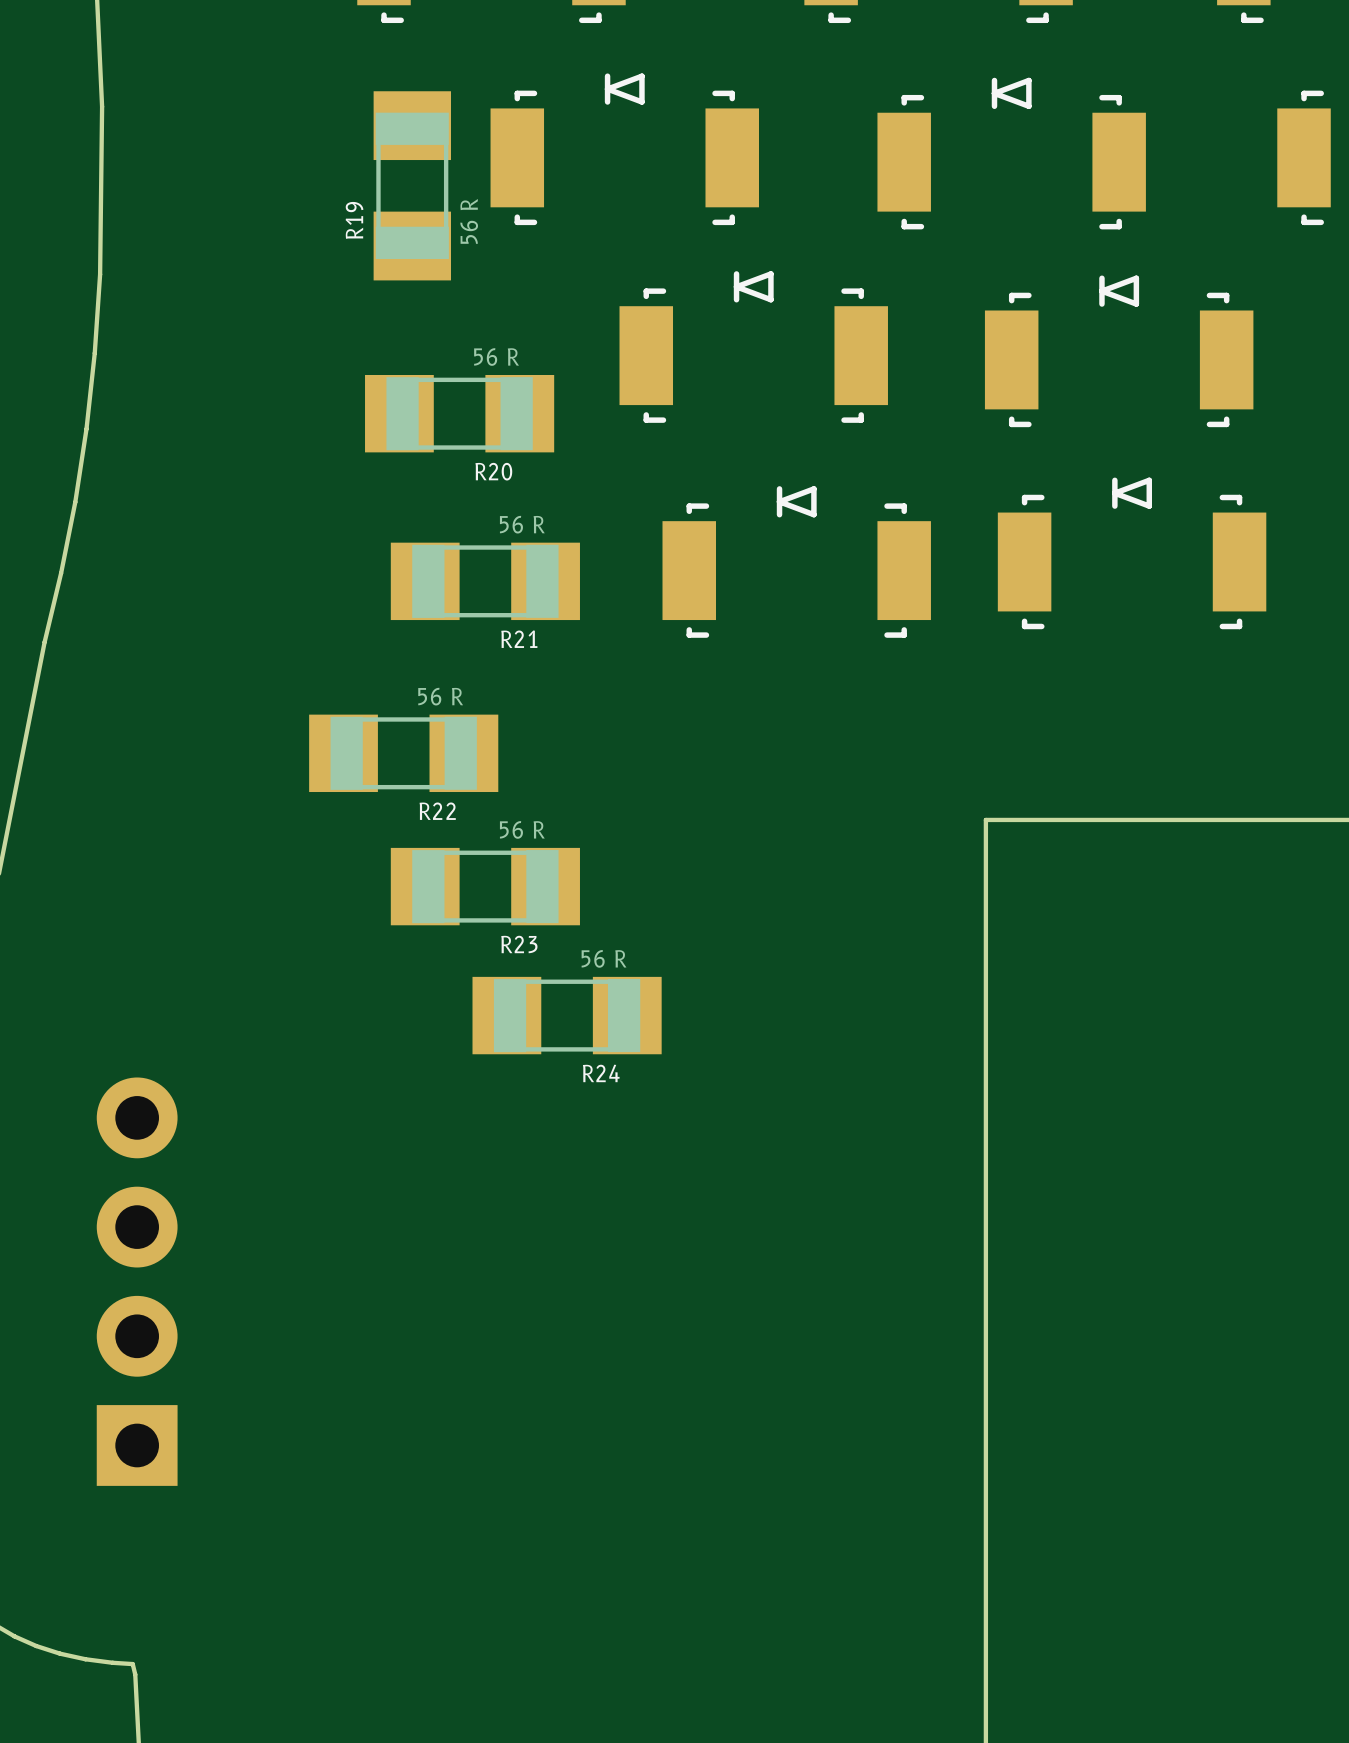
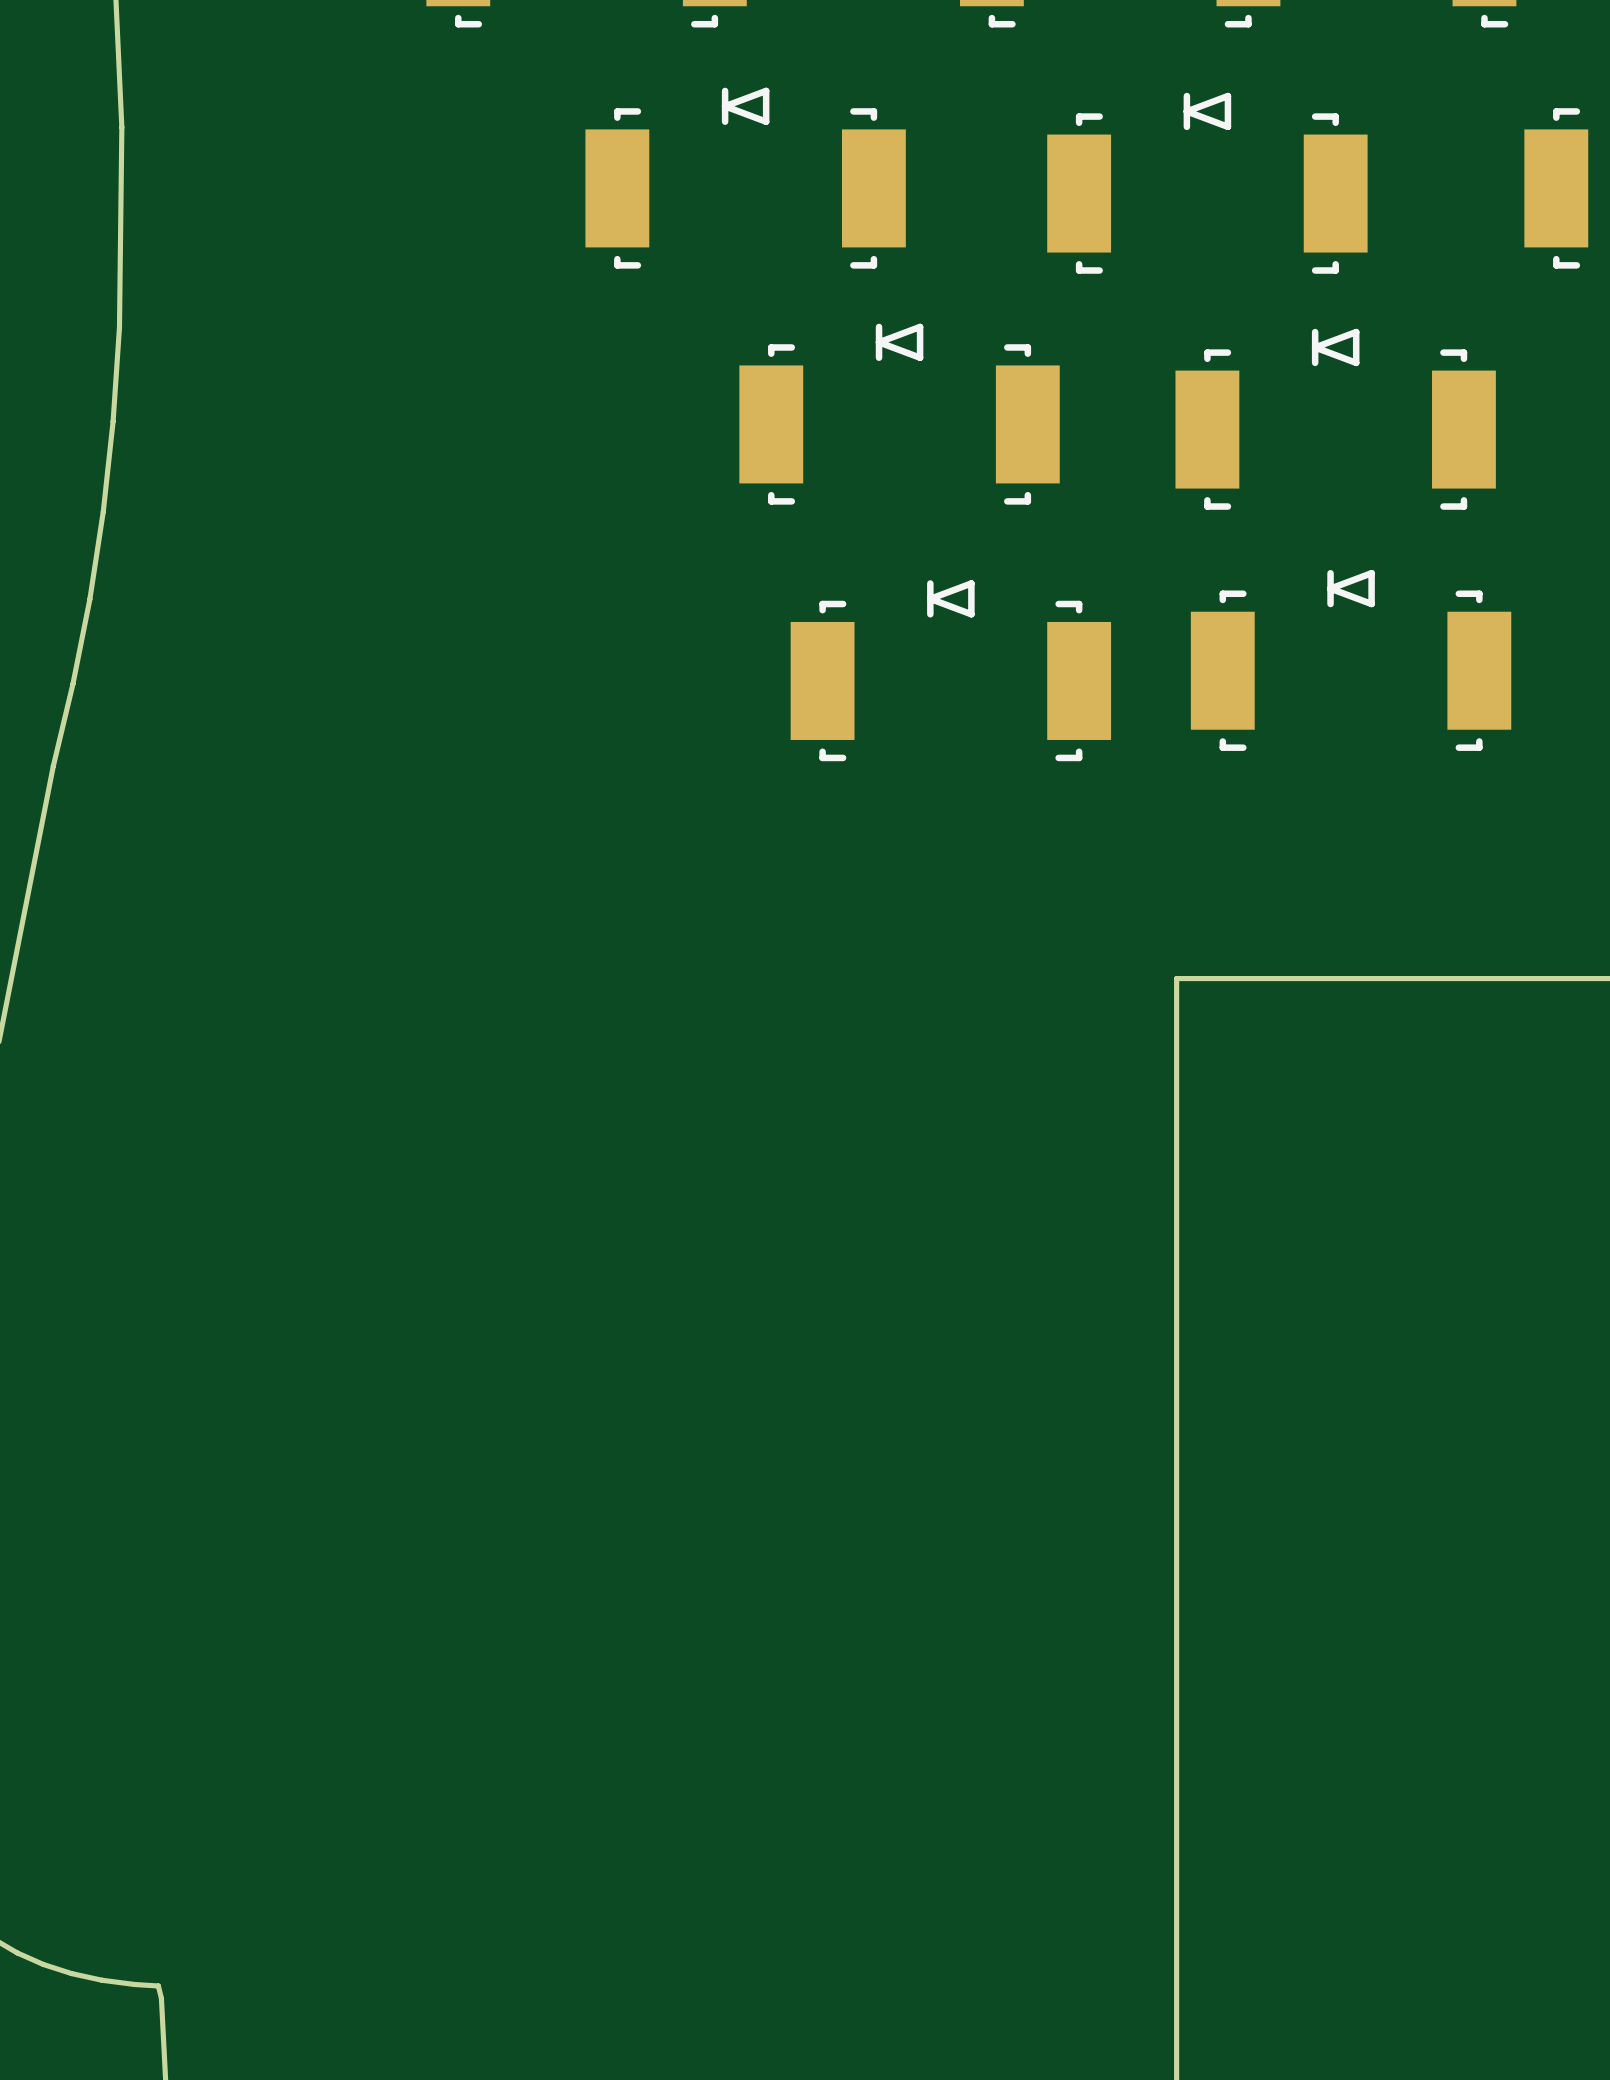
R19: 56 R (412, 185) -> none
R20: 56 R (459, 413) -> none
R21: 56 R (485, 581) -> none
R22: 56 R (403, 753) -> none
R23: 56 R (485, 886) -> none
R24: 56 R (567, 1015) -> none
part: (137, 1281) -> none

